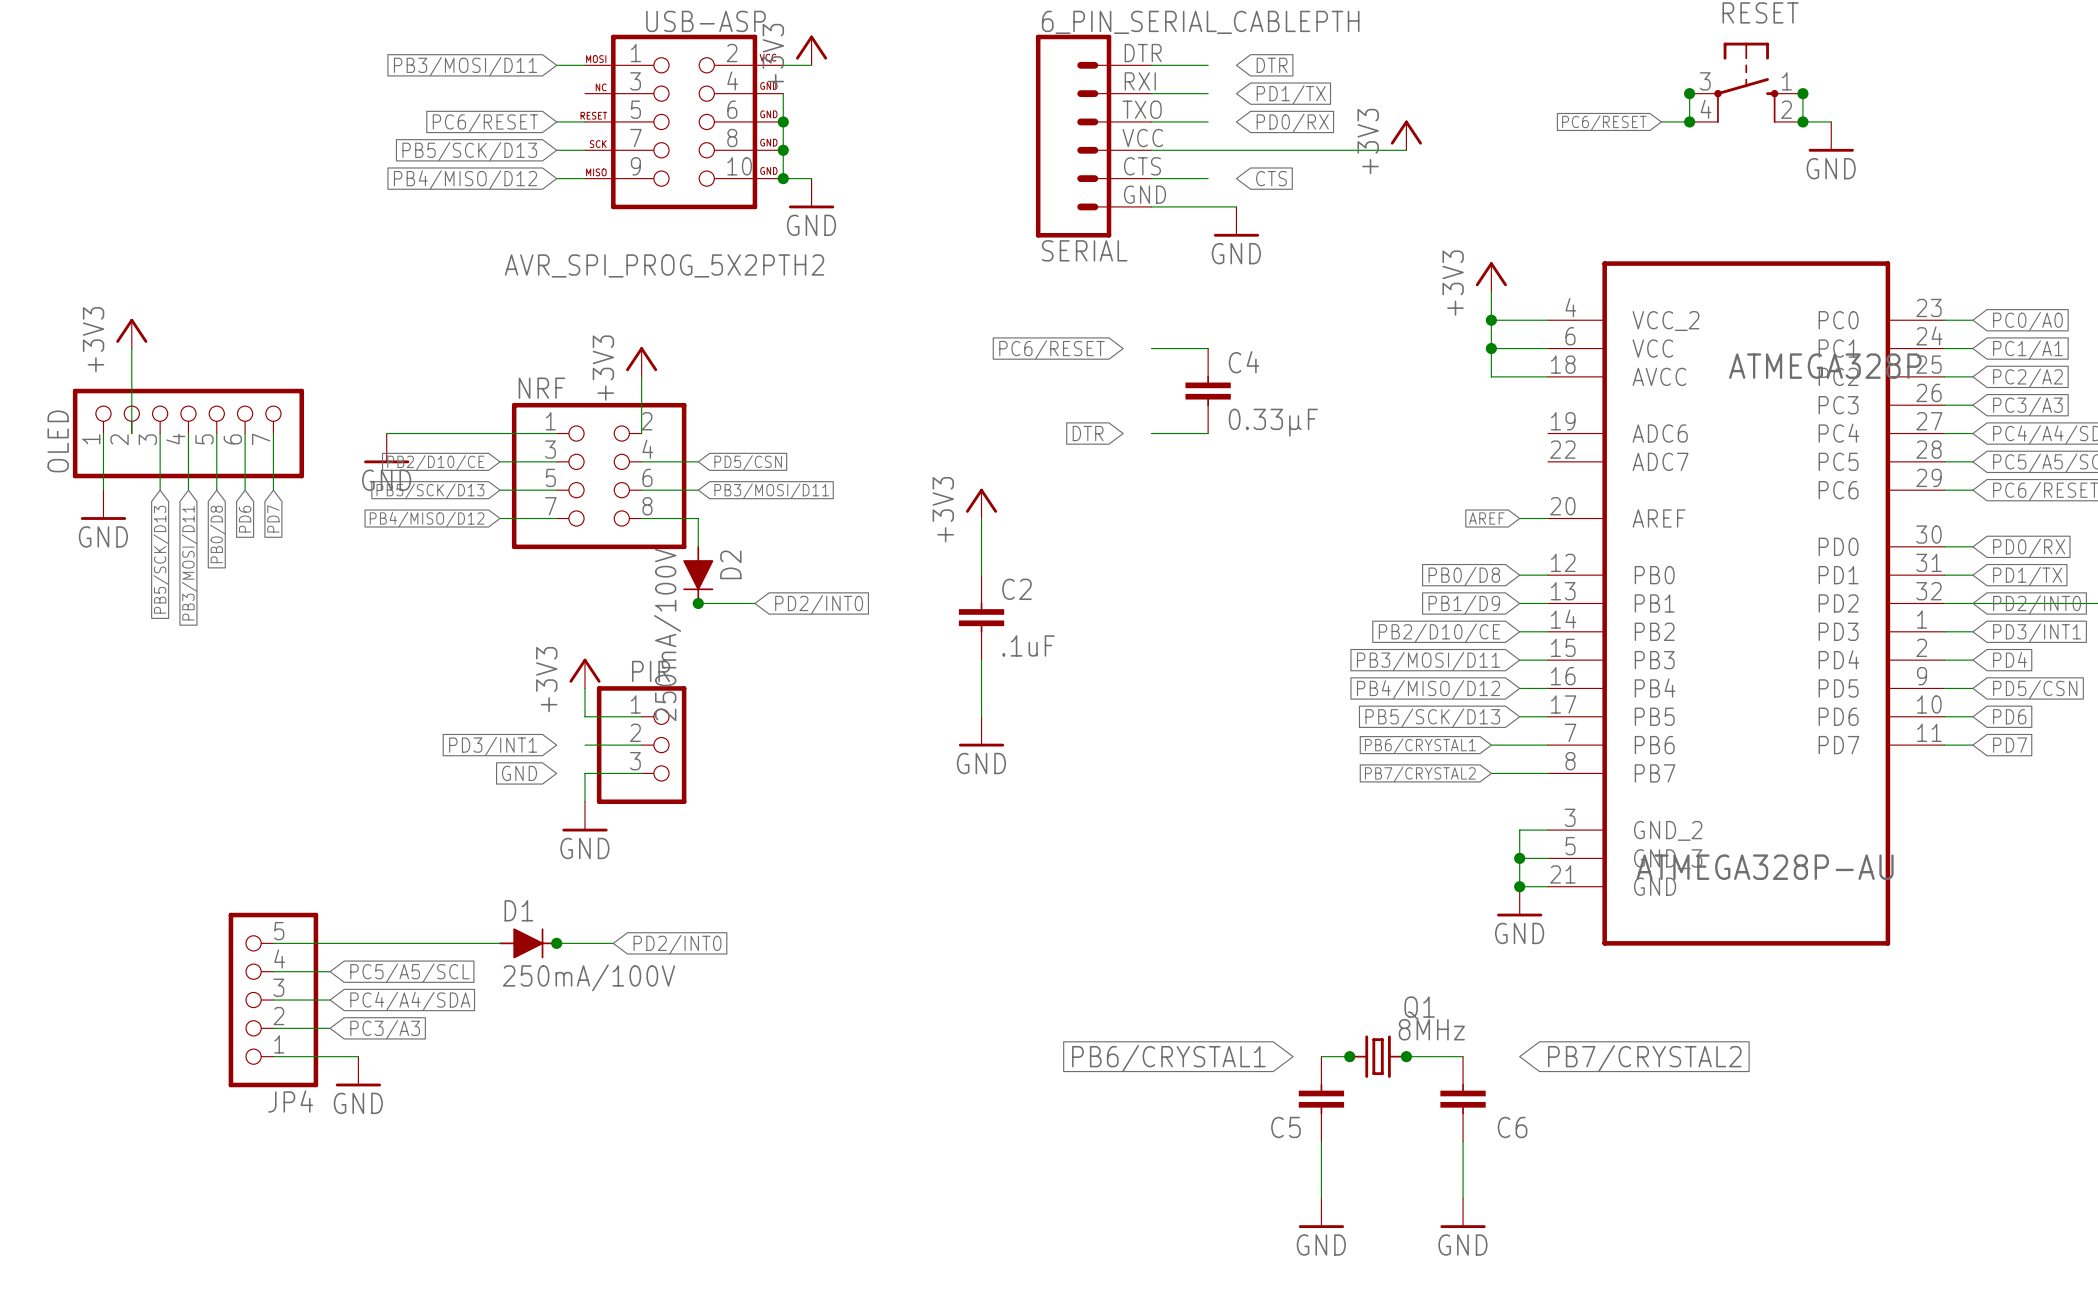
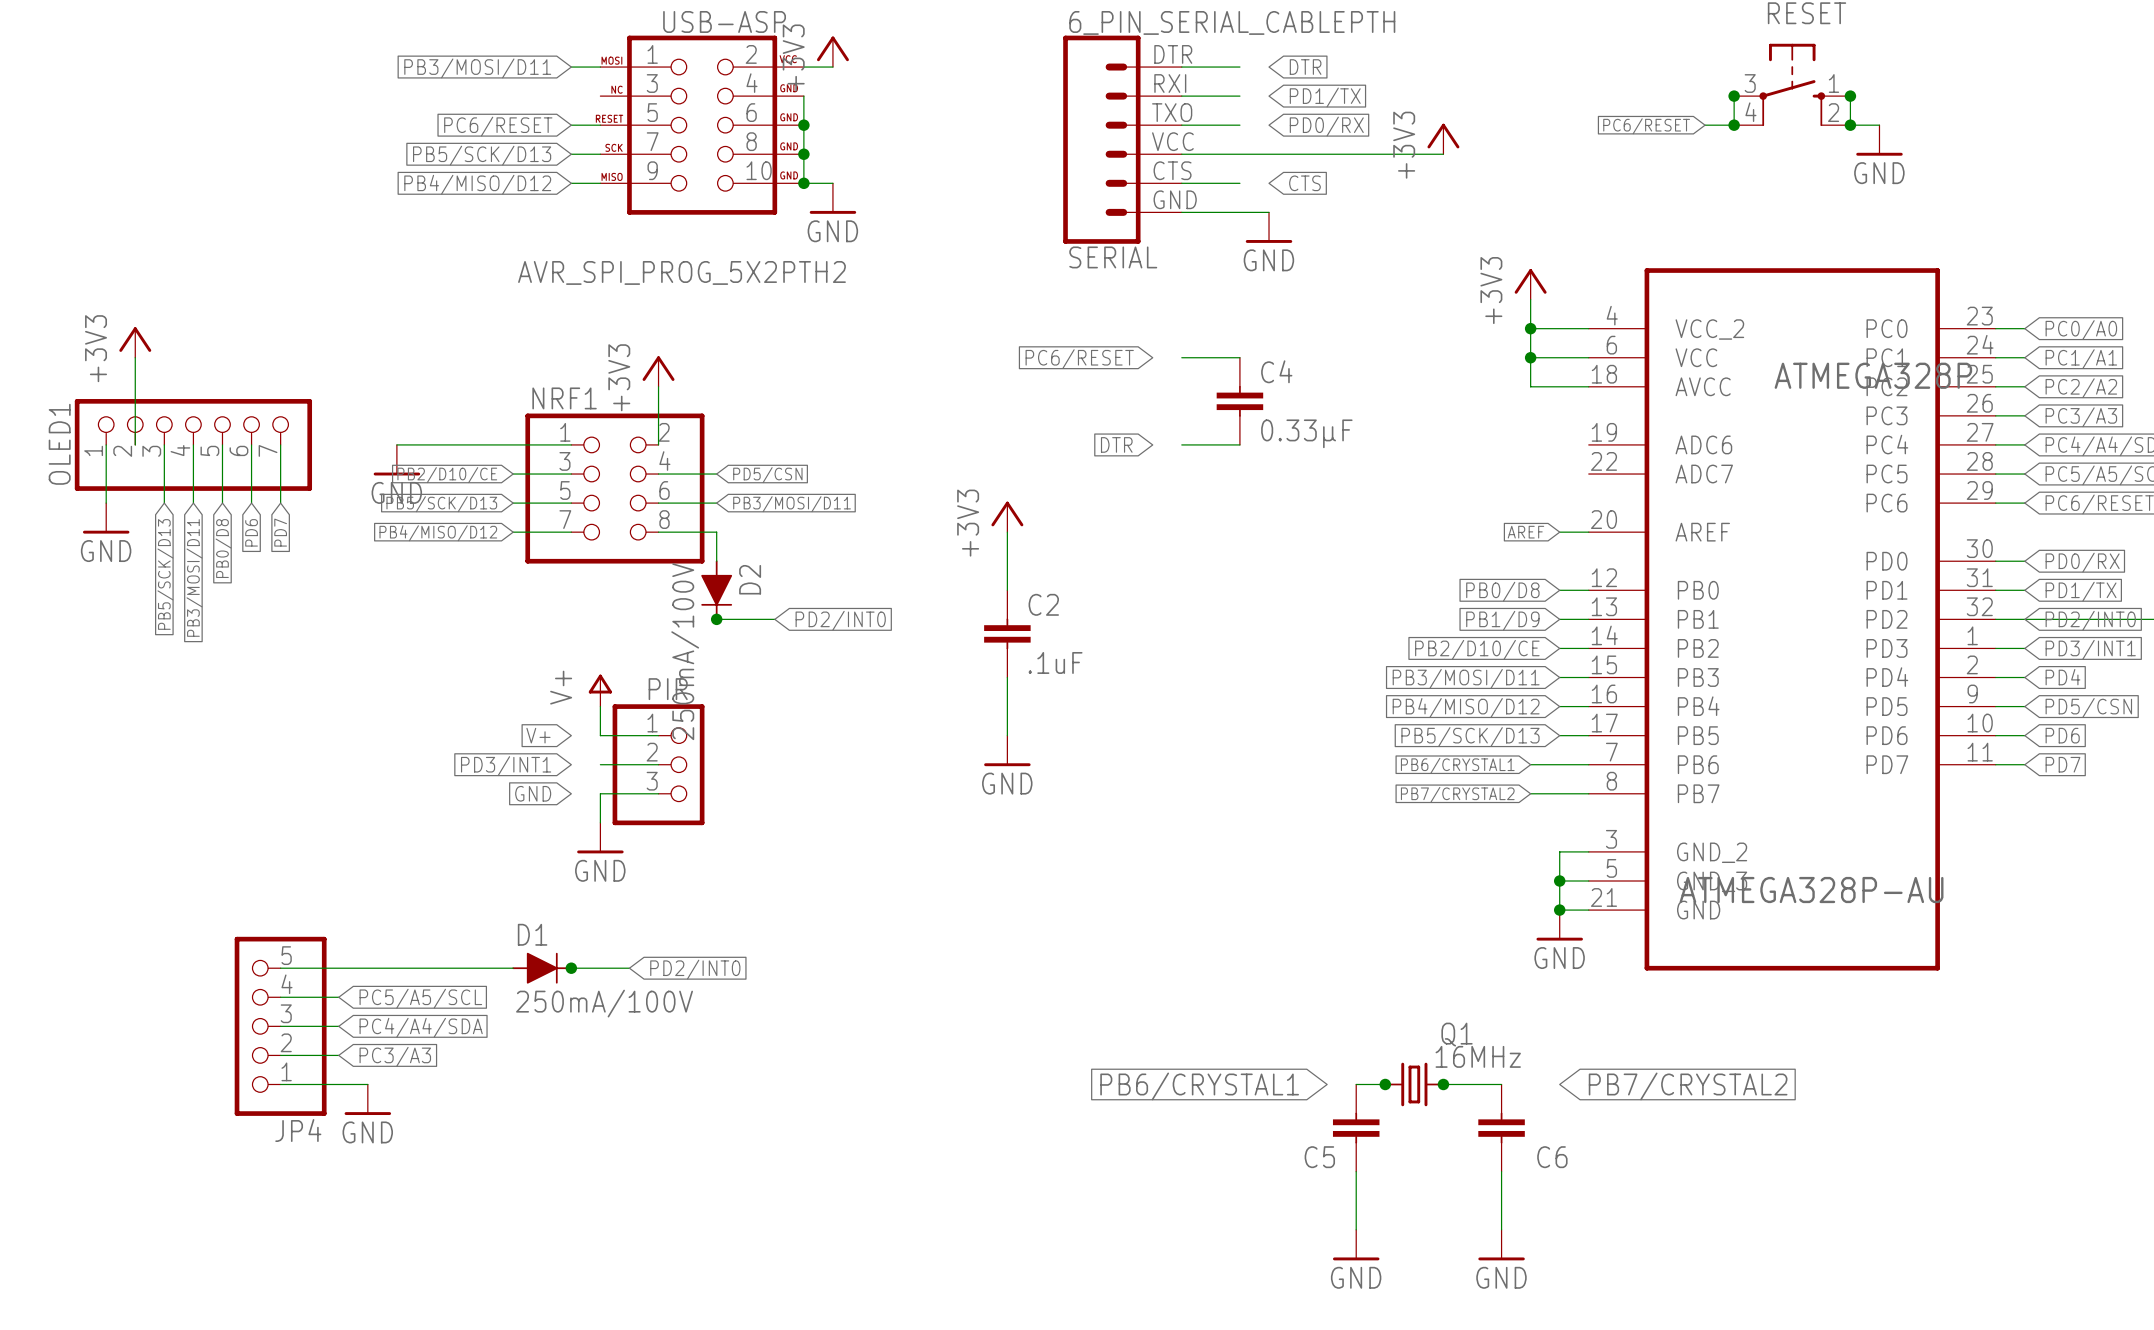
NRF name: NRF (541, 388) -> NRF1 (564, 398)
OLED name: OLED (58, 441) -> OLED1 (59, 444)
power symbol: +3V3 (584, 673) -> V+ (600, 690)
global label: none -> V+ (538, 735)
Q1 value: 8MHz (1431, 1029) -> 16MHz (1478, 1056)

